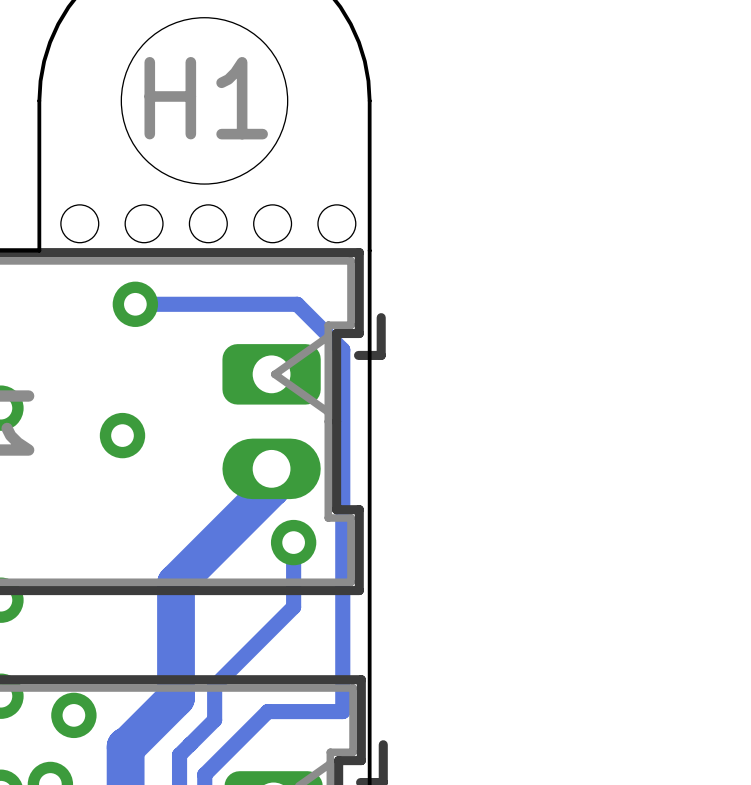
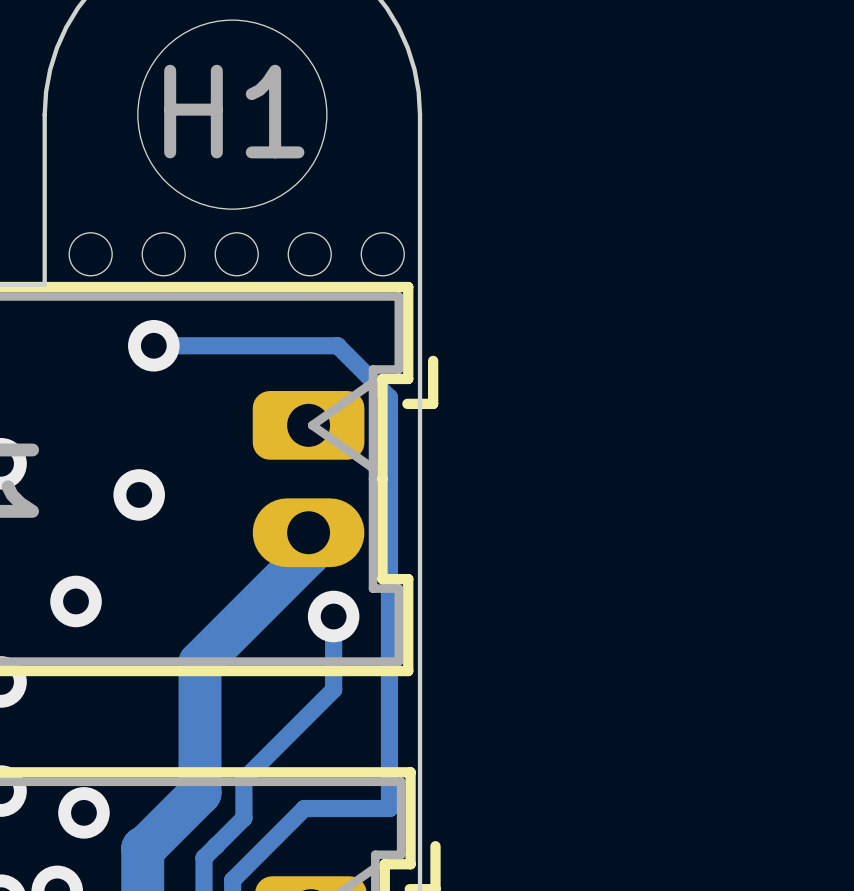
via: none -> (76, 601)

